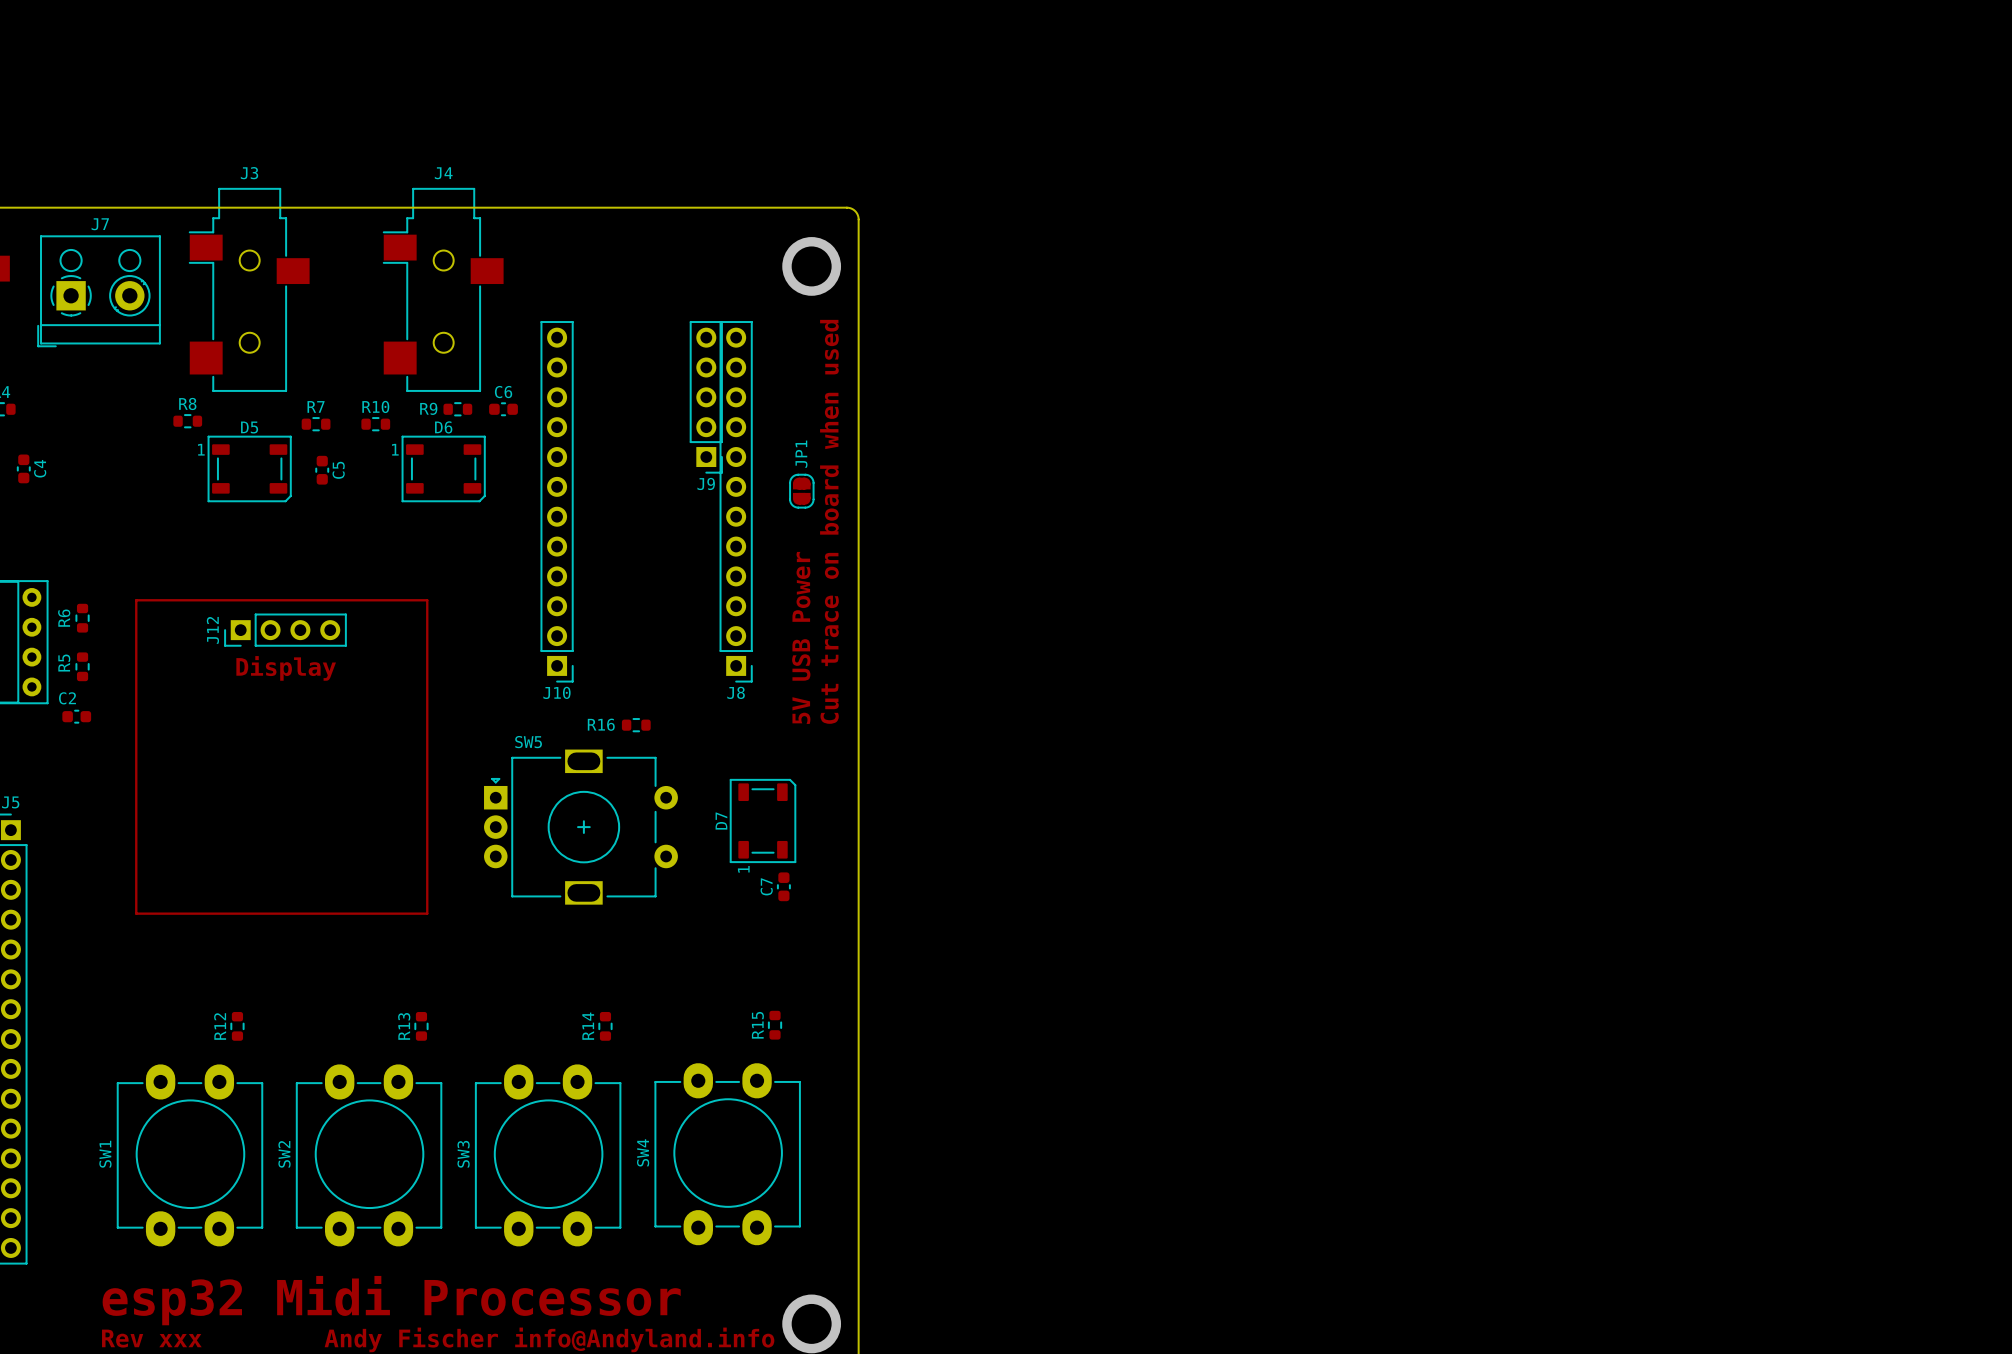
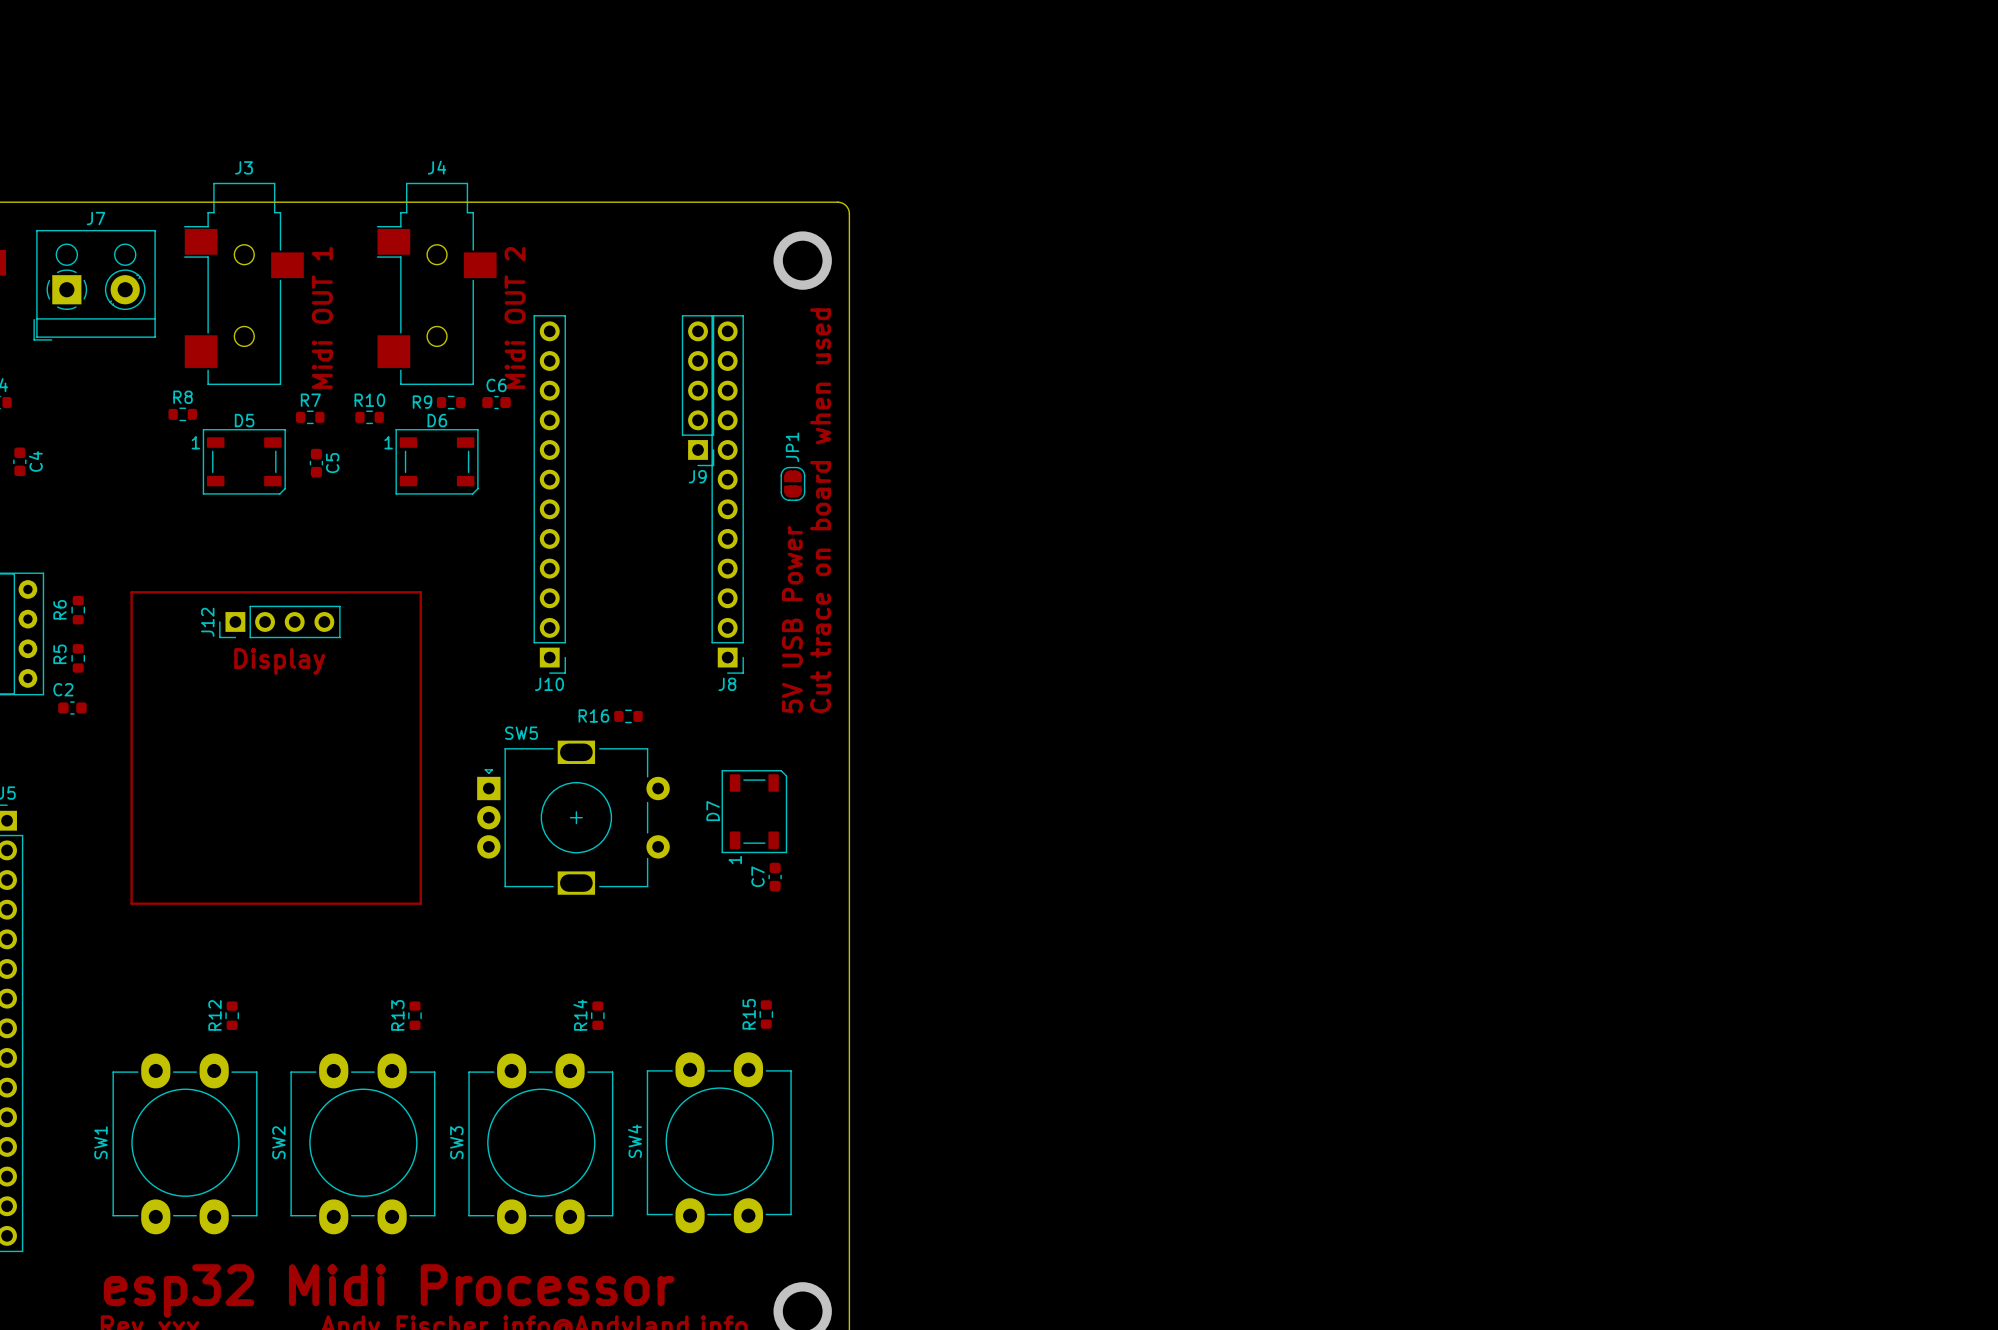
text: none -> Midi OUT 1 (322, 317)
text: none -> Midi OUT 2 (515, 317)

